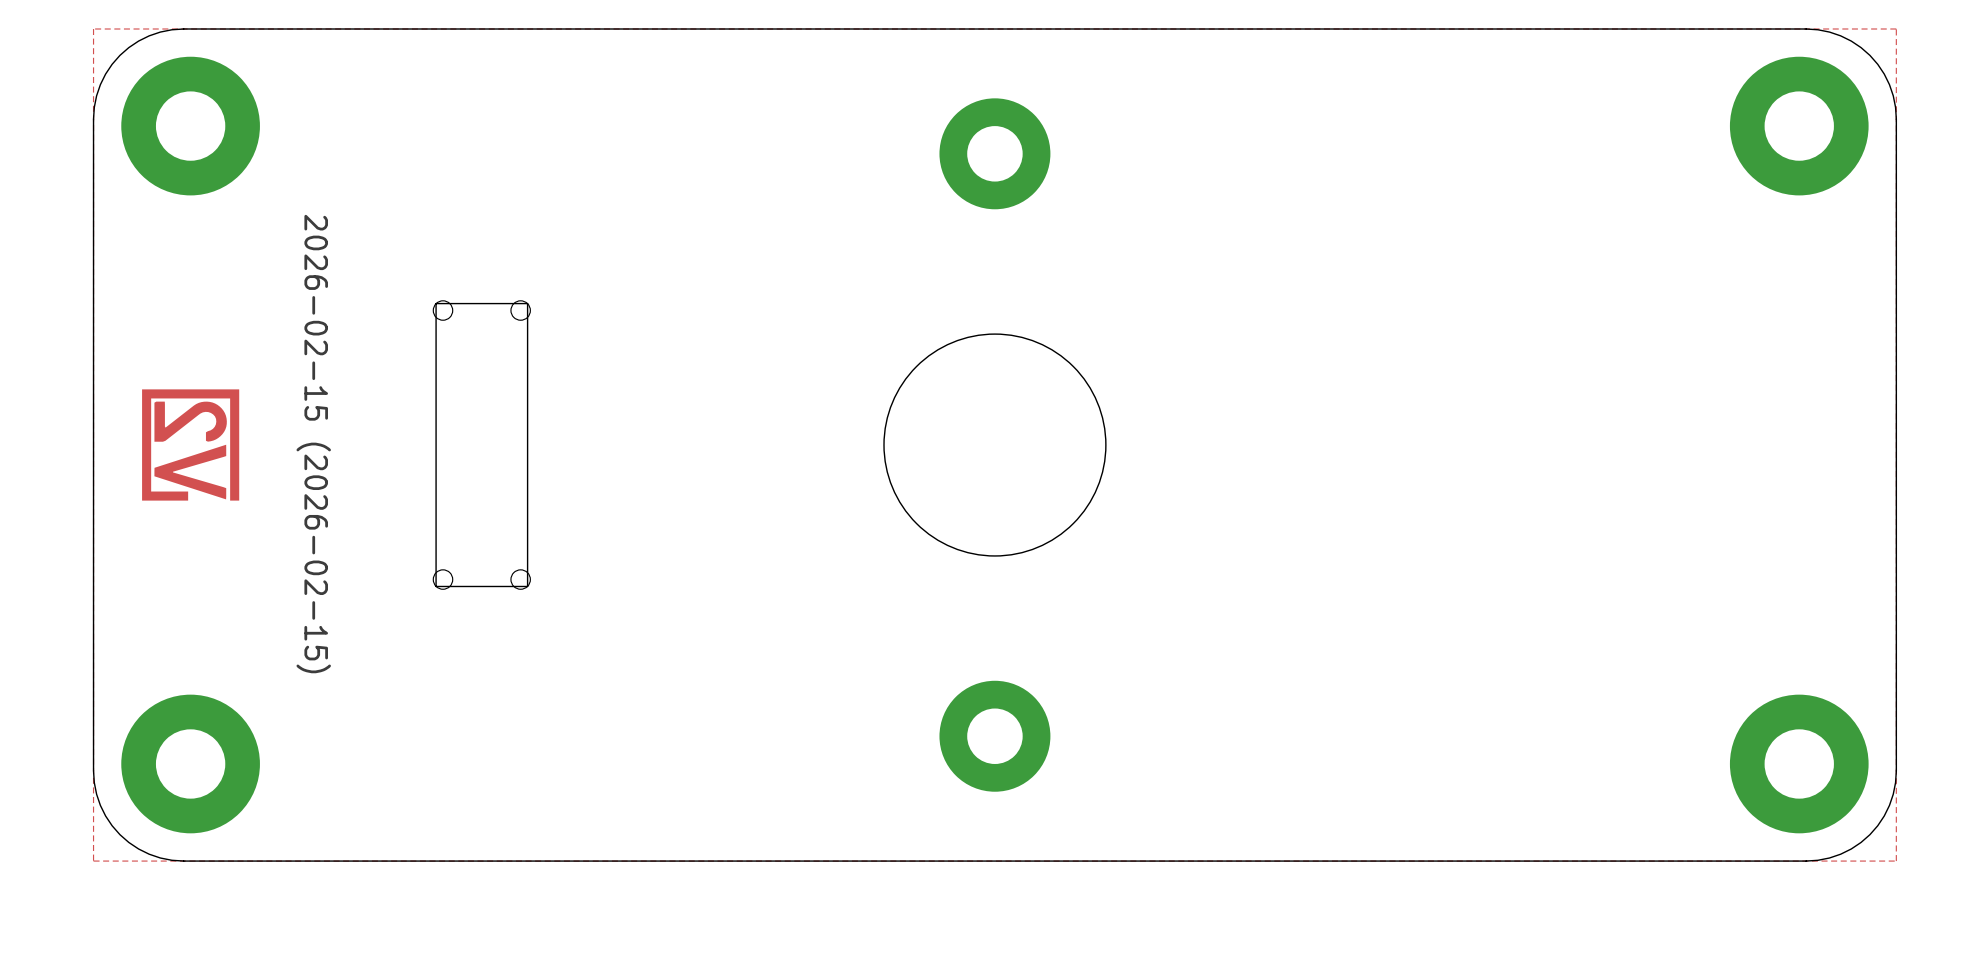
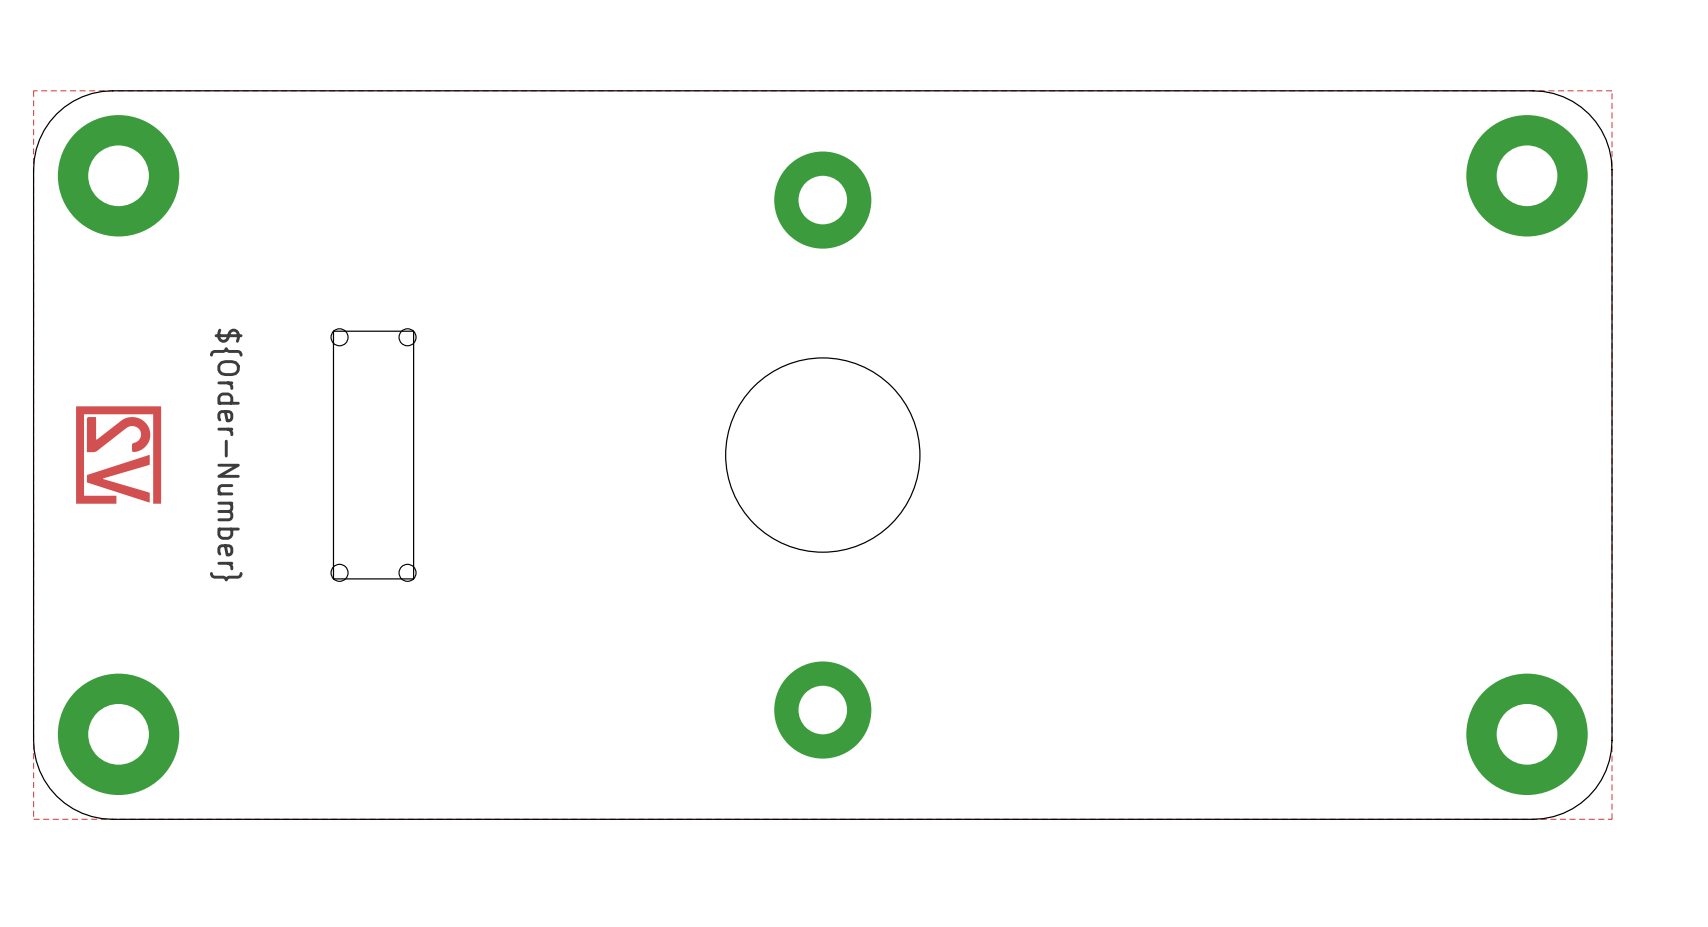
drawing shape: [296, 214, 331, 674] -> [210, 328, 243, 582]

